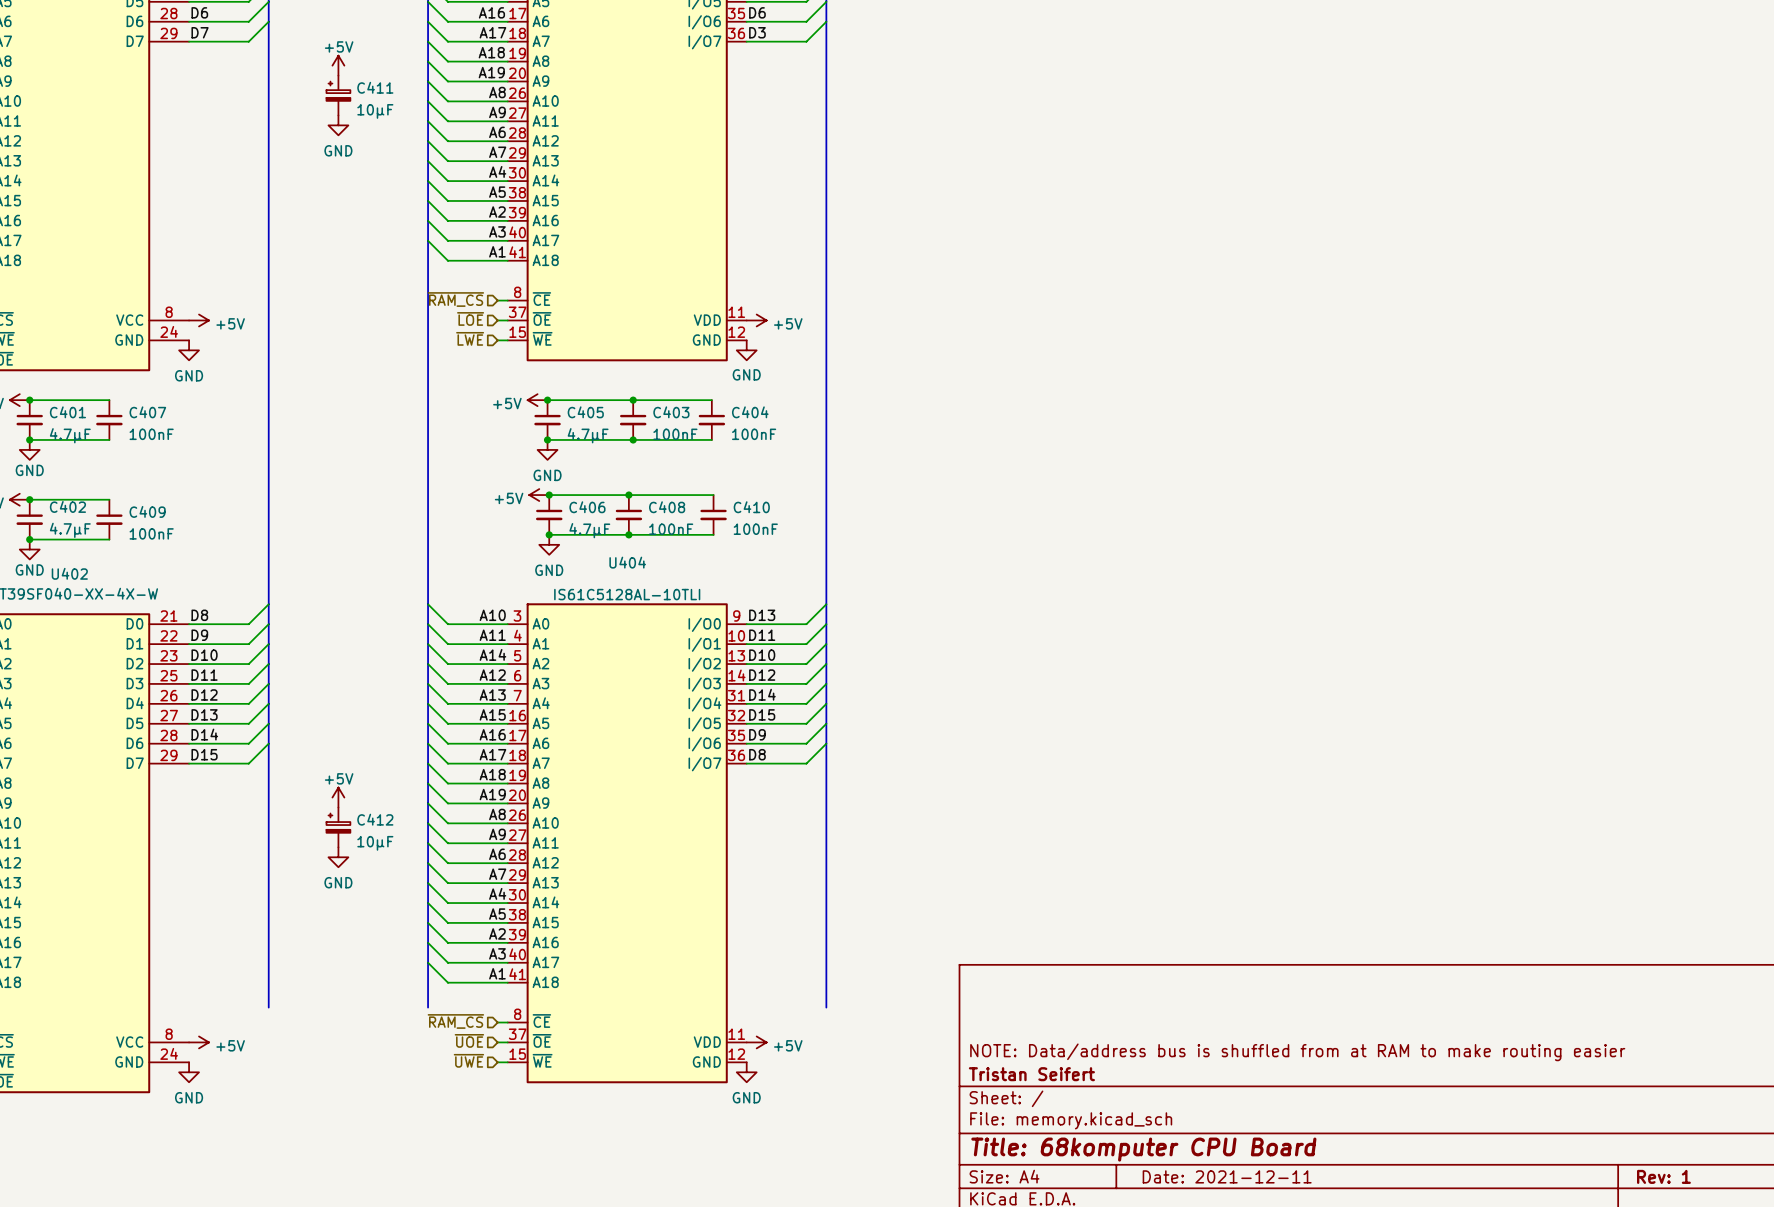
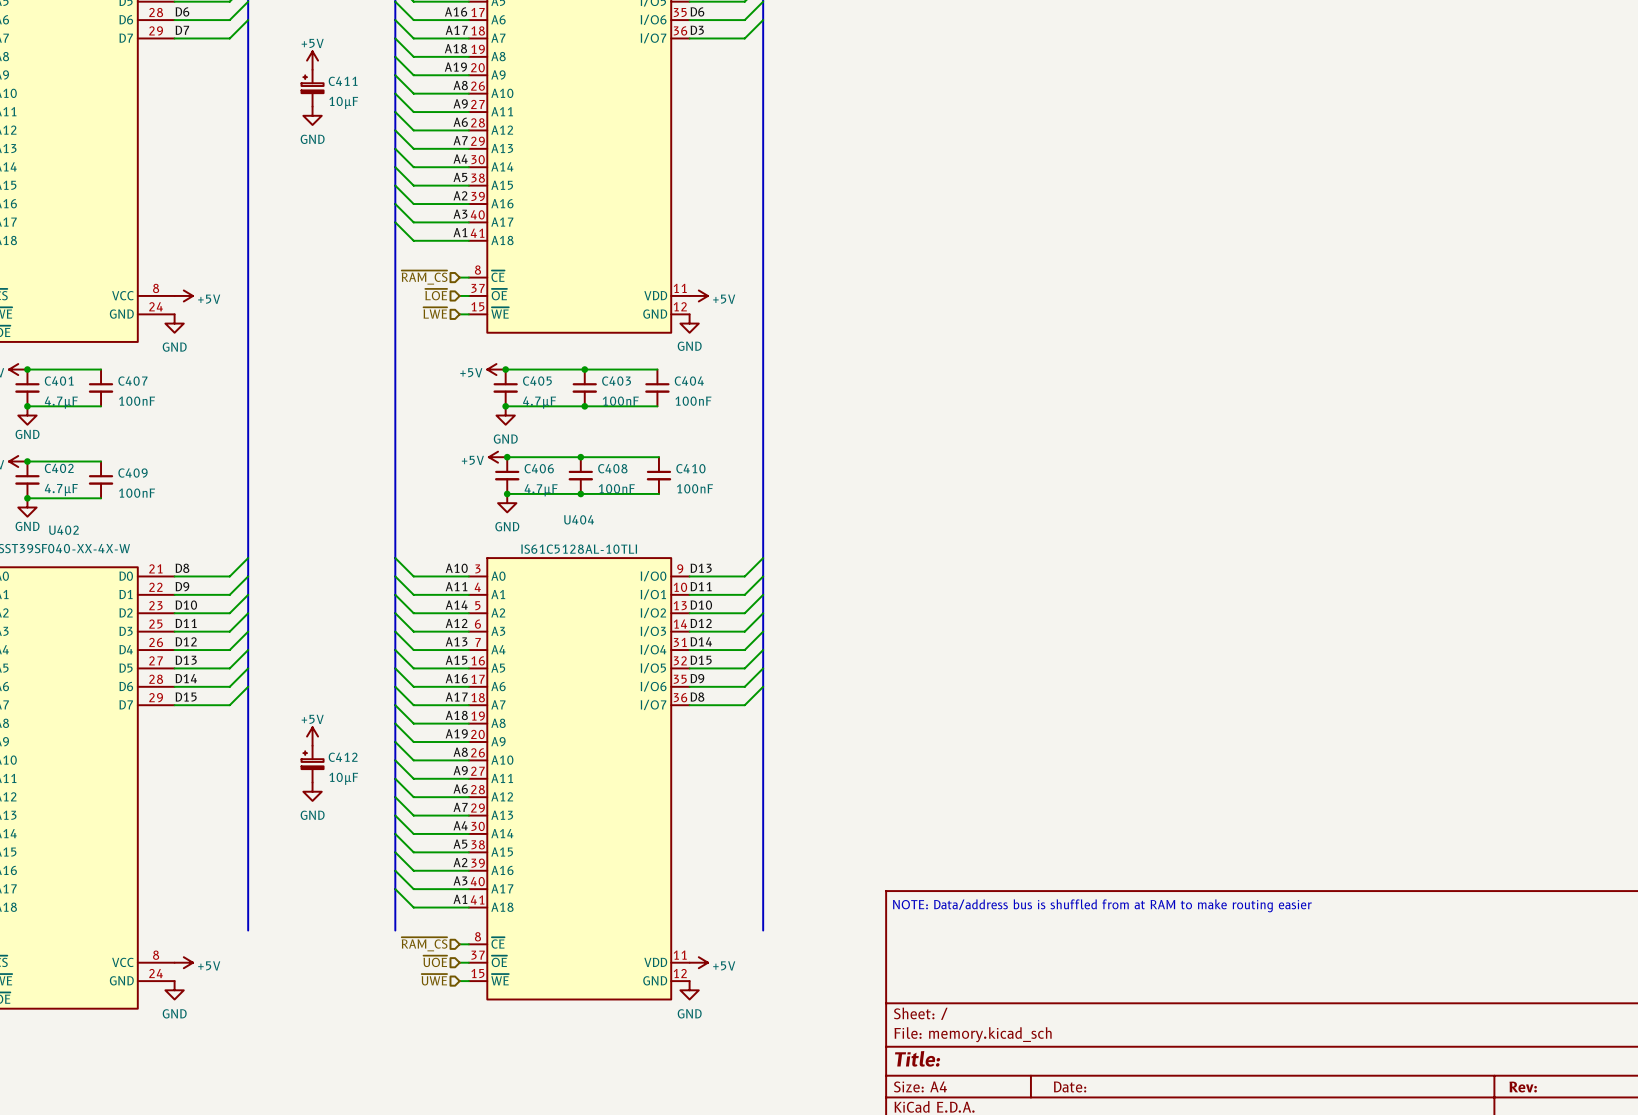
text: none -> NOTE: Data/address bus is shuffled from at RAM to make routing easier (1102, 905)
title block: NOTE: Data/address bus is shuffled from at RAM to make routing easier (1297, 1052) -> none
title block: Tristan Seifert (1031, 1074) -> none
title block: Title: 68komputer CPU Board (1143, 1149) -> Title: (917, 1058)
title block: Date: 2021-12-11 (1227, 1176) -> Date: (1070, 1086)
title block: Rev: 1 (1663, 1176) -> Rev: (1523, 1087)

